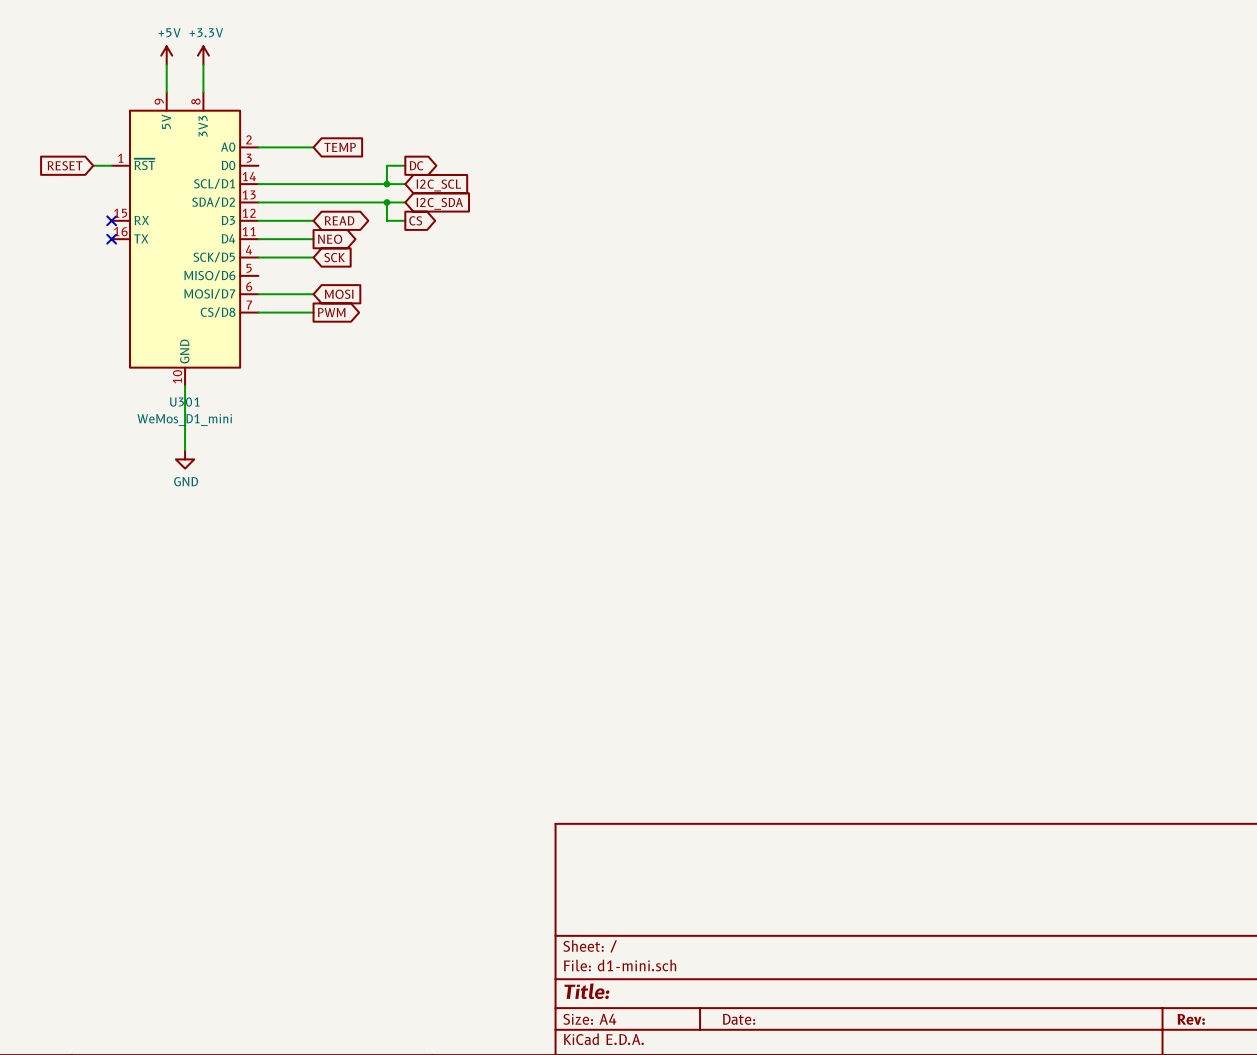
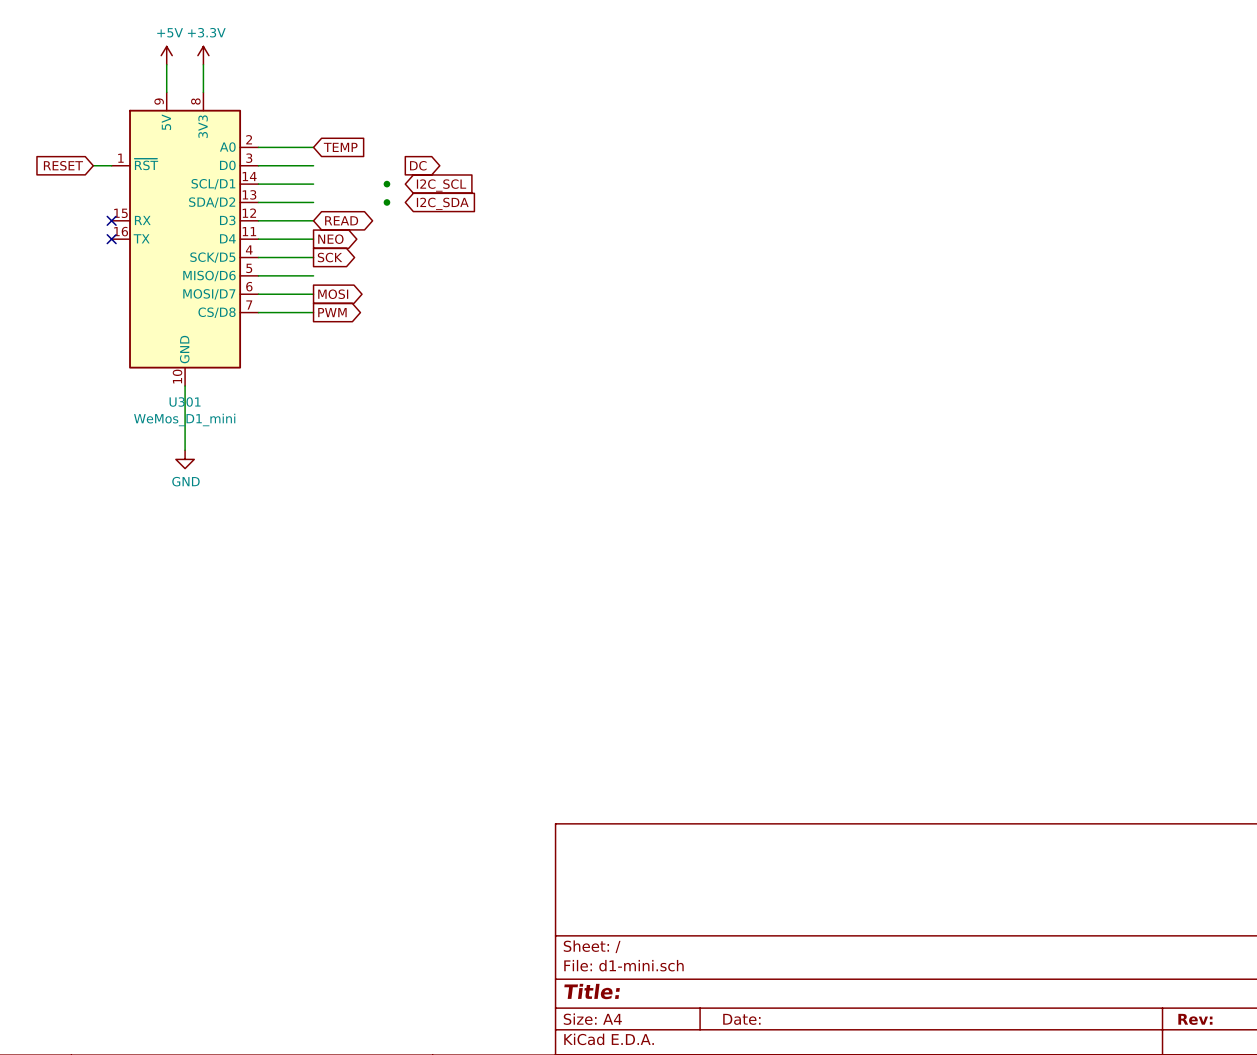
wire: none -> (258, 165) (313, 165)
wire: (405, 165) (386, 165) (386, 184) -> none
wire: (313, 184) (405, 184) -> none
wire: (313, 202) (405, 202) -> none
wire: (386, 202) (386, 220) (405, 220) -> none
global label: CS (415, 220) -> none
global label shape: input (334, 257) -> output (330, 257)
wire: none -> (258, 275) (313, 275)
global label shape: input (339, 294) -> output (333, 294)

